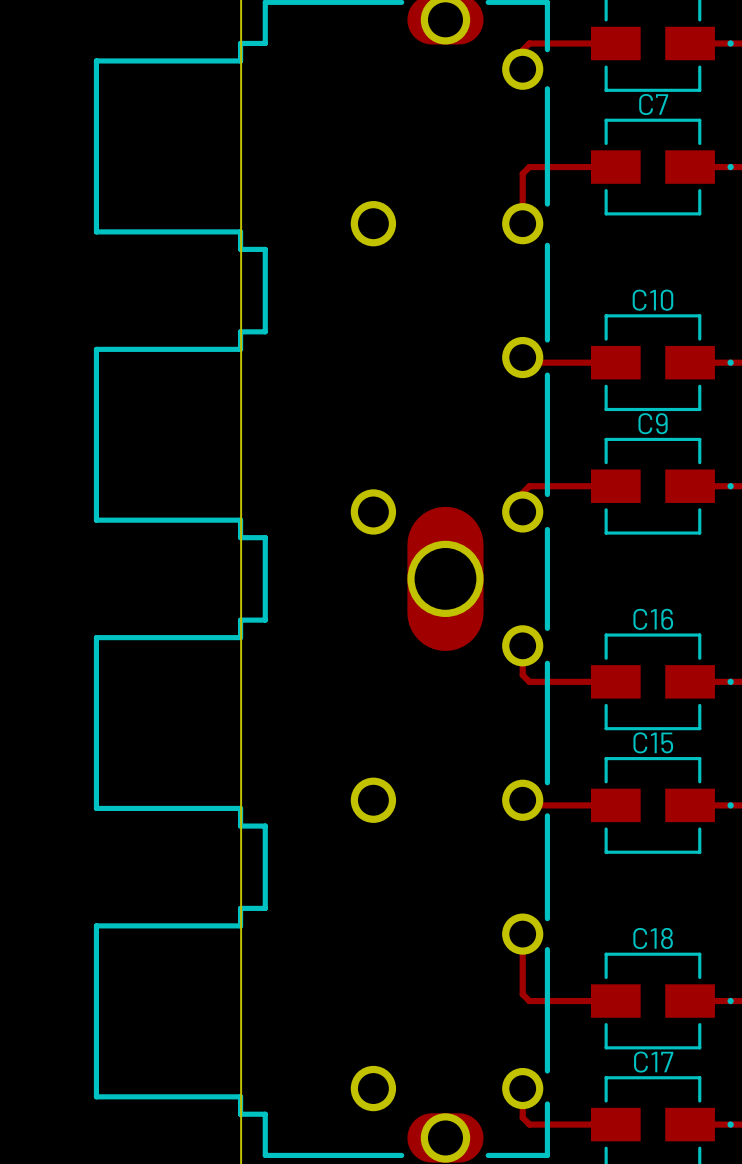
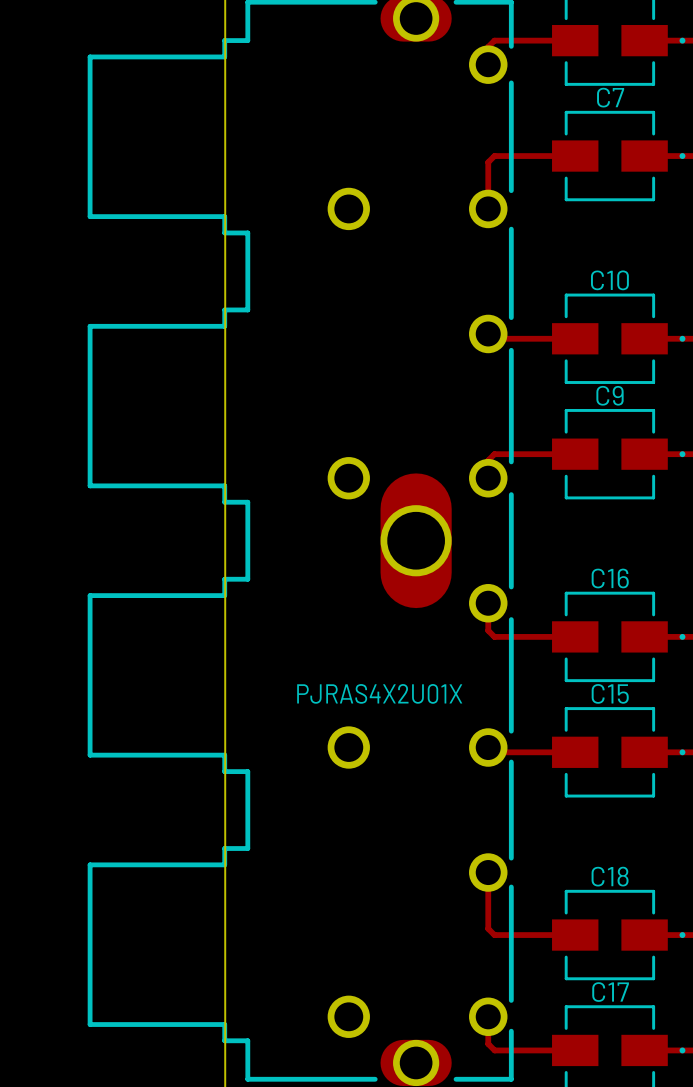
part value: none -> PJRAS4X2U01X (379, 693)

